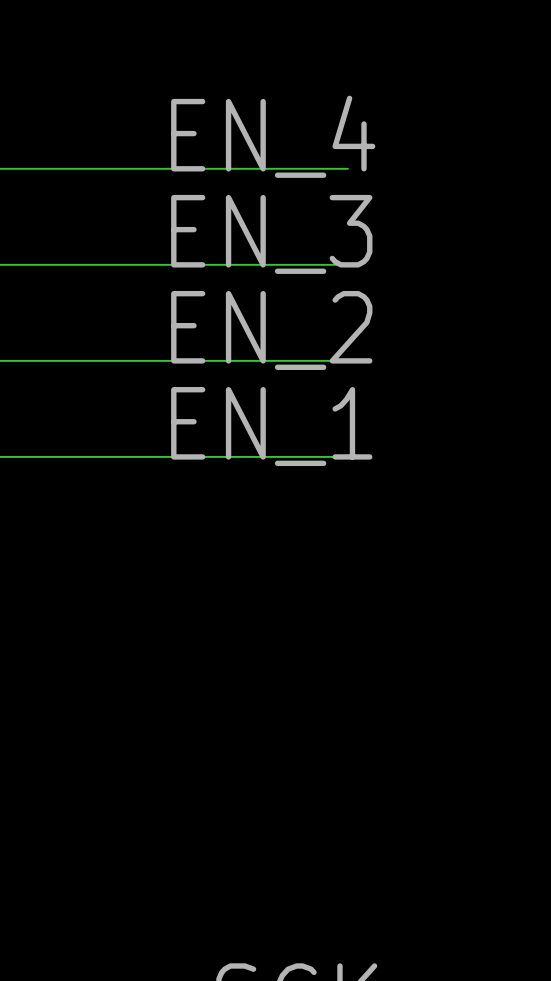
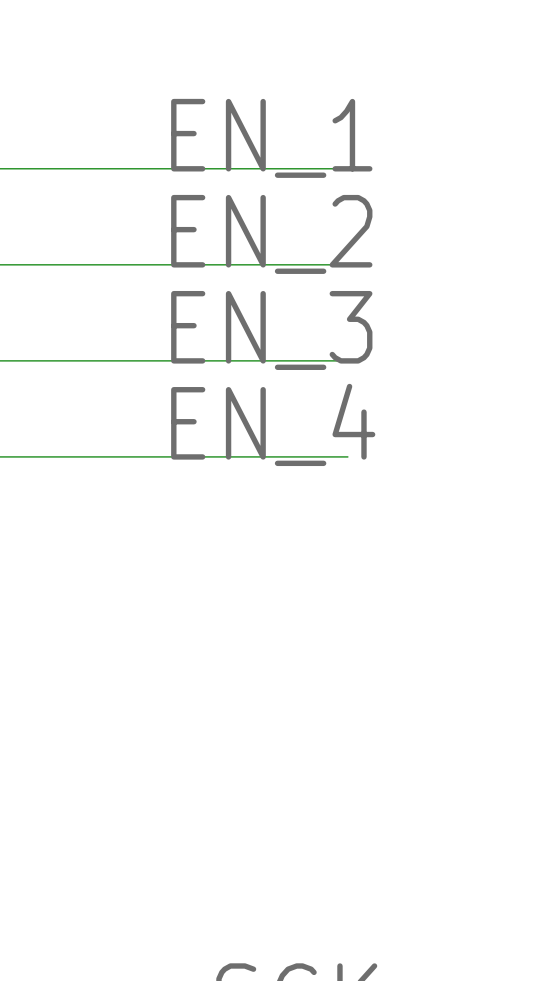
label: EN_4 (273, 136) -> EN_1 (271, 138)
label: EN_3 (271, 234) -> EN_2 (271, 234)
label: EN_2 (271, 330) -> EN_3 (271, 330)
label: EN_1 (271, 426) -> EN_4 (273, 424)

